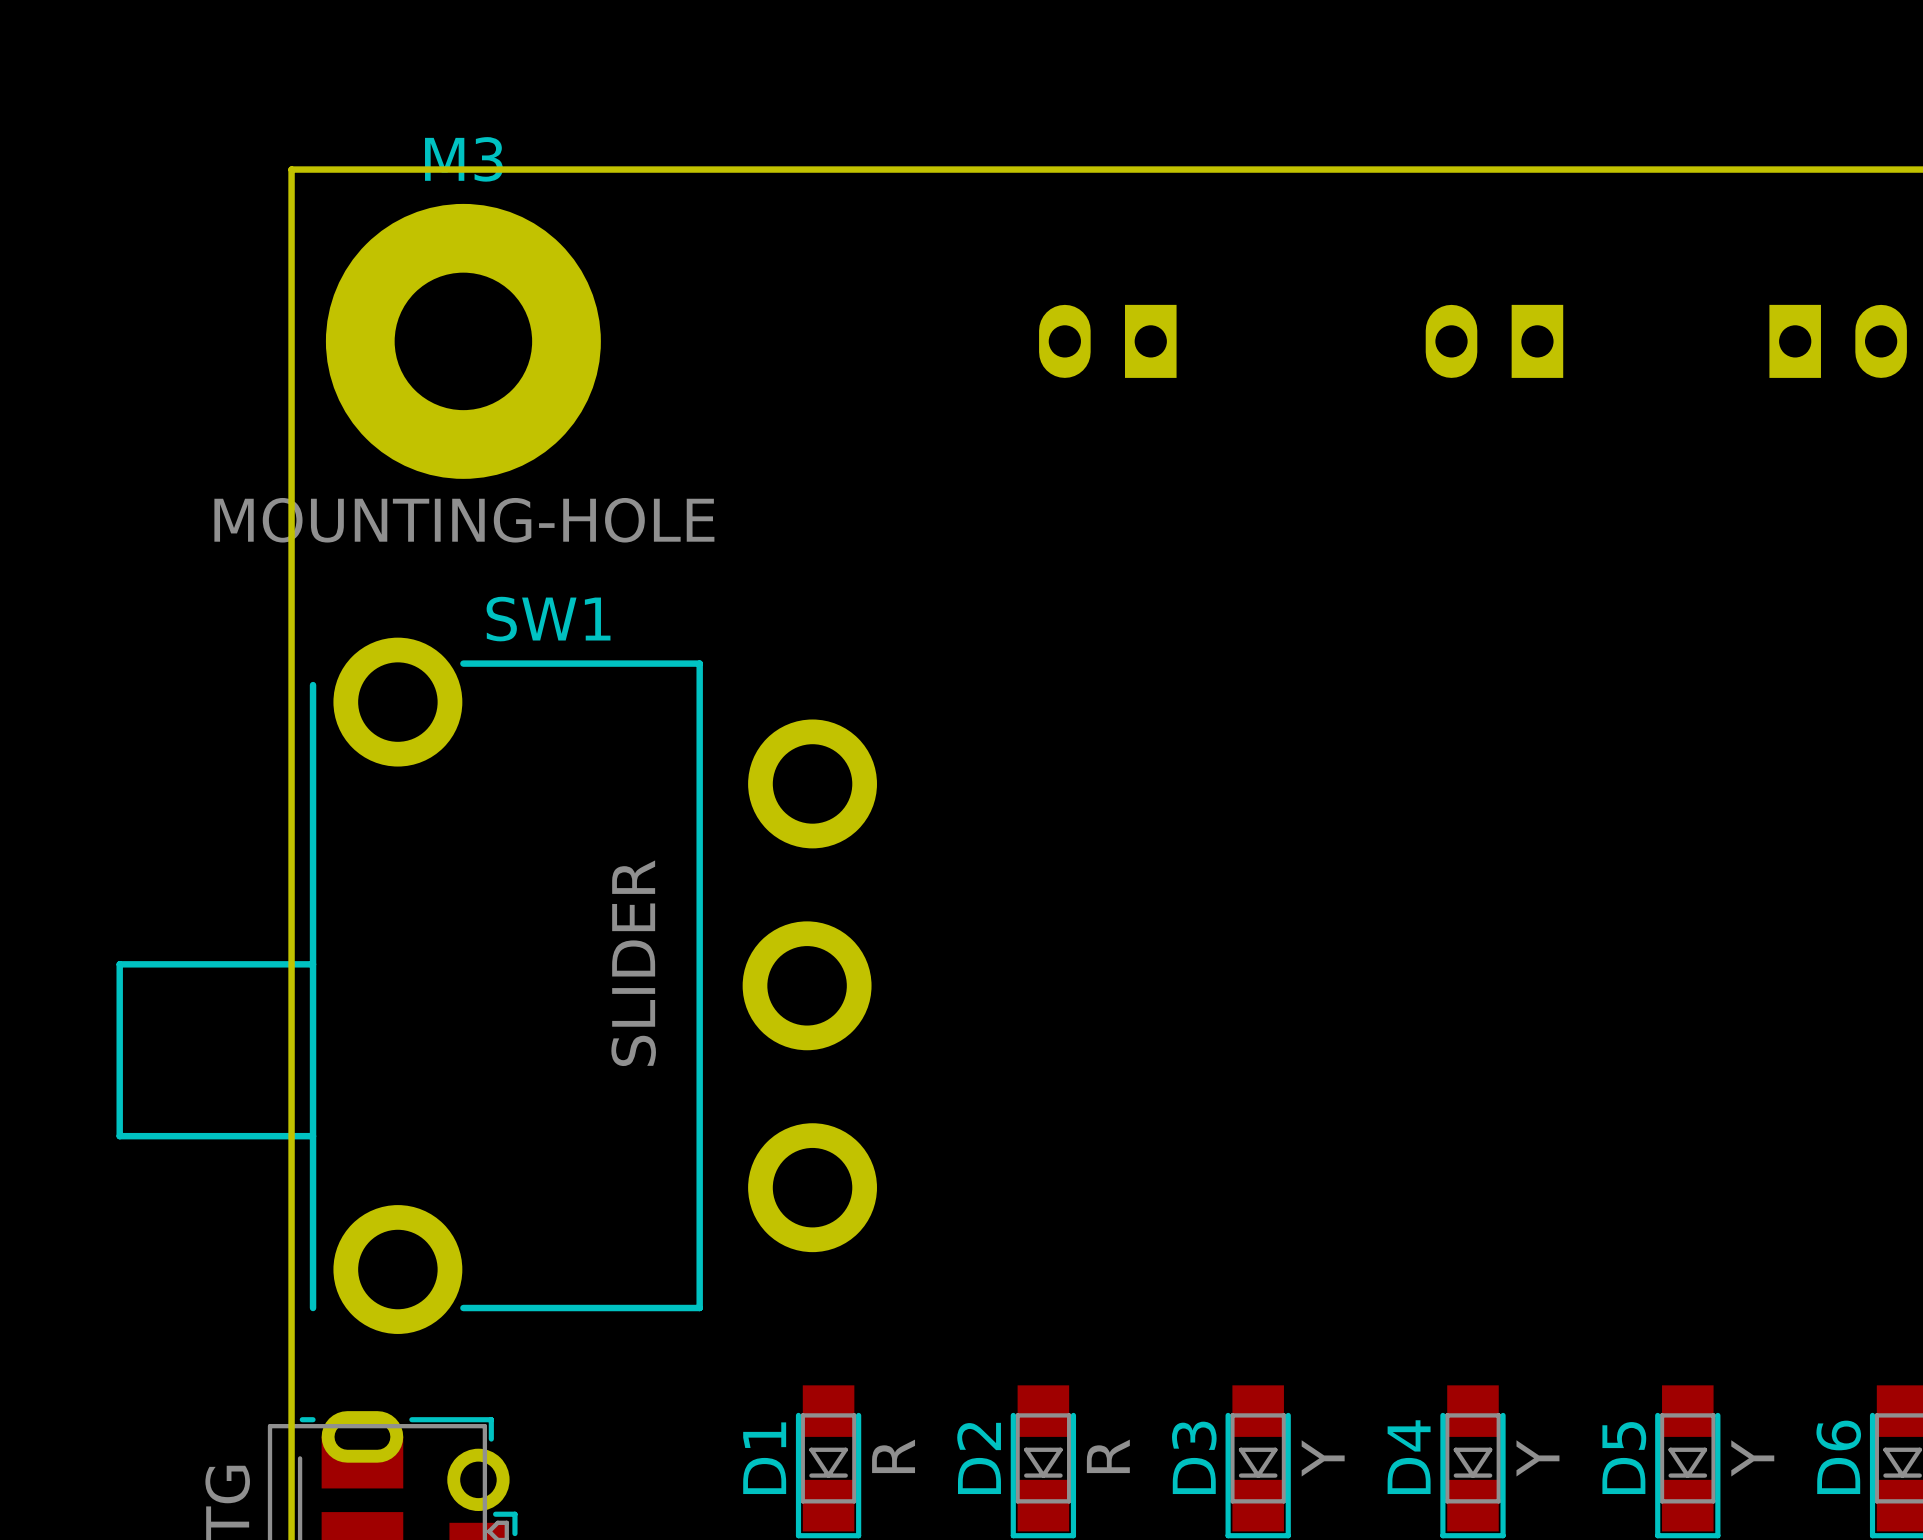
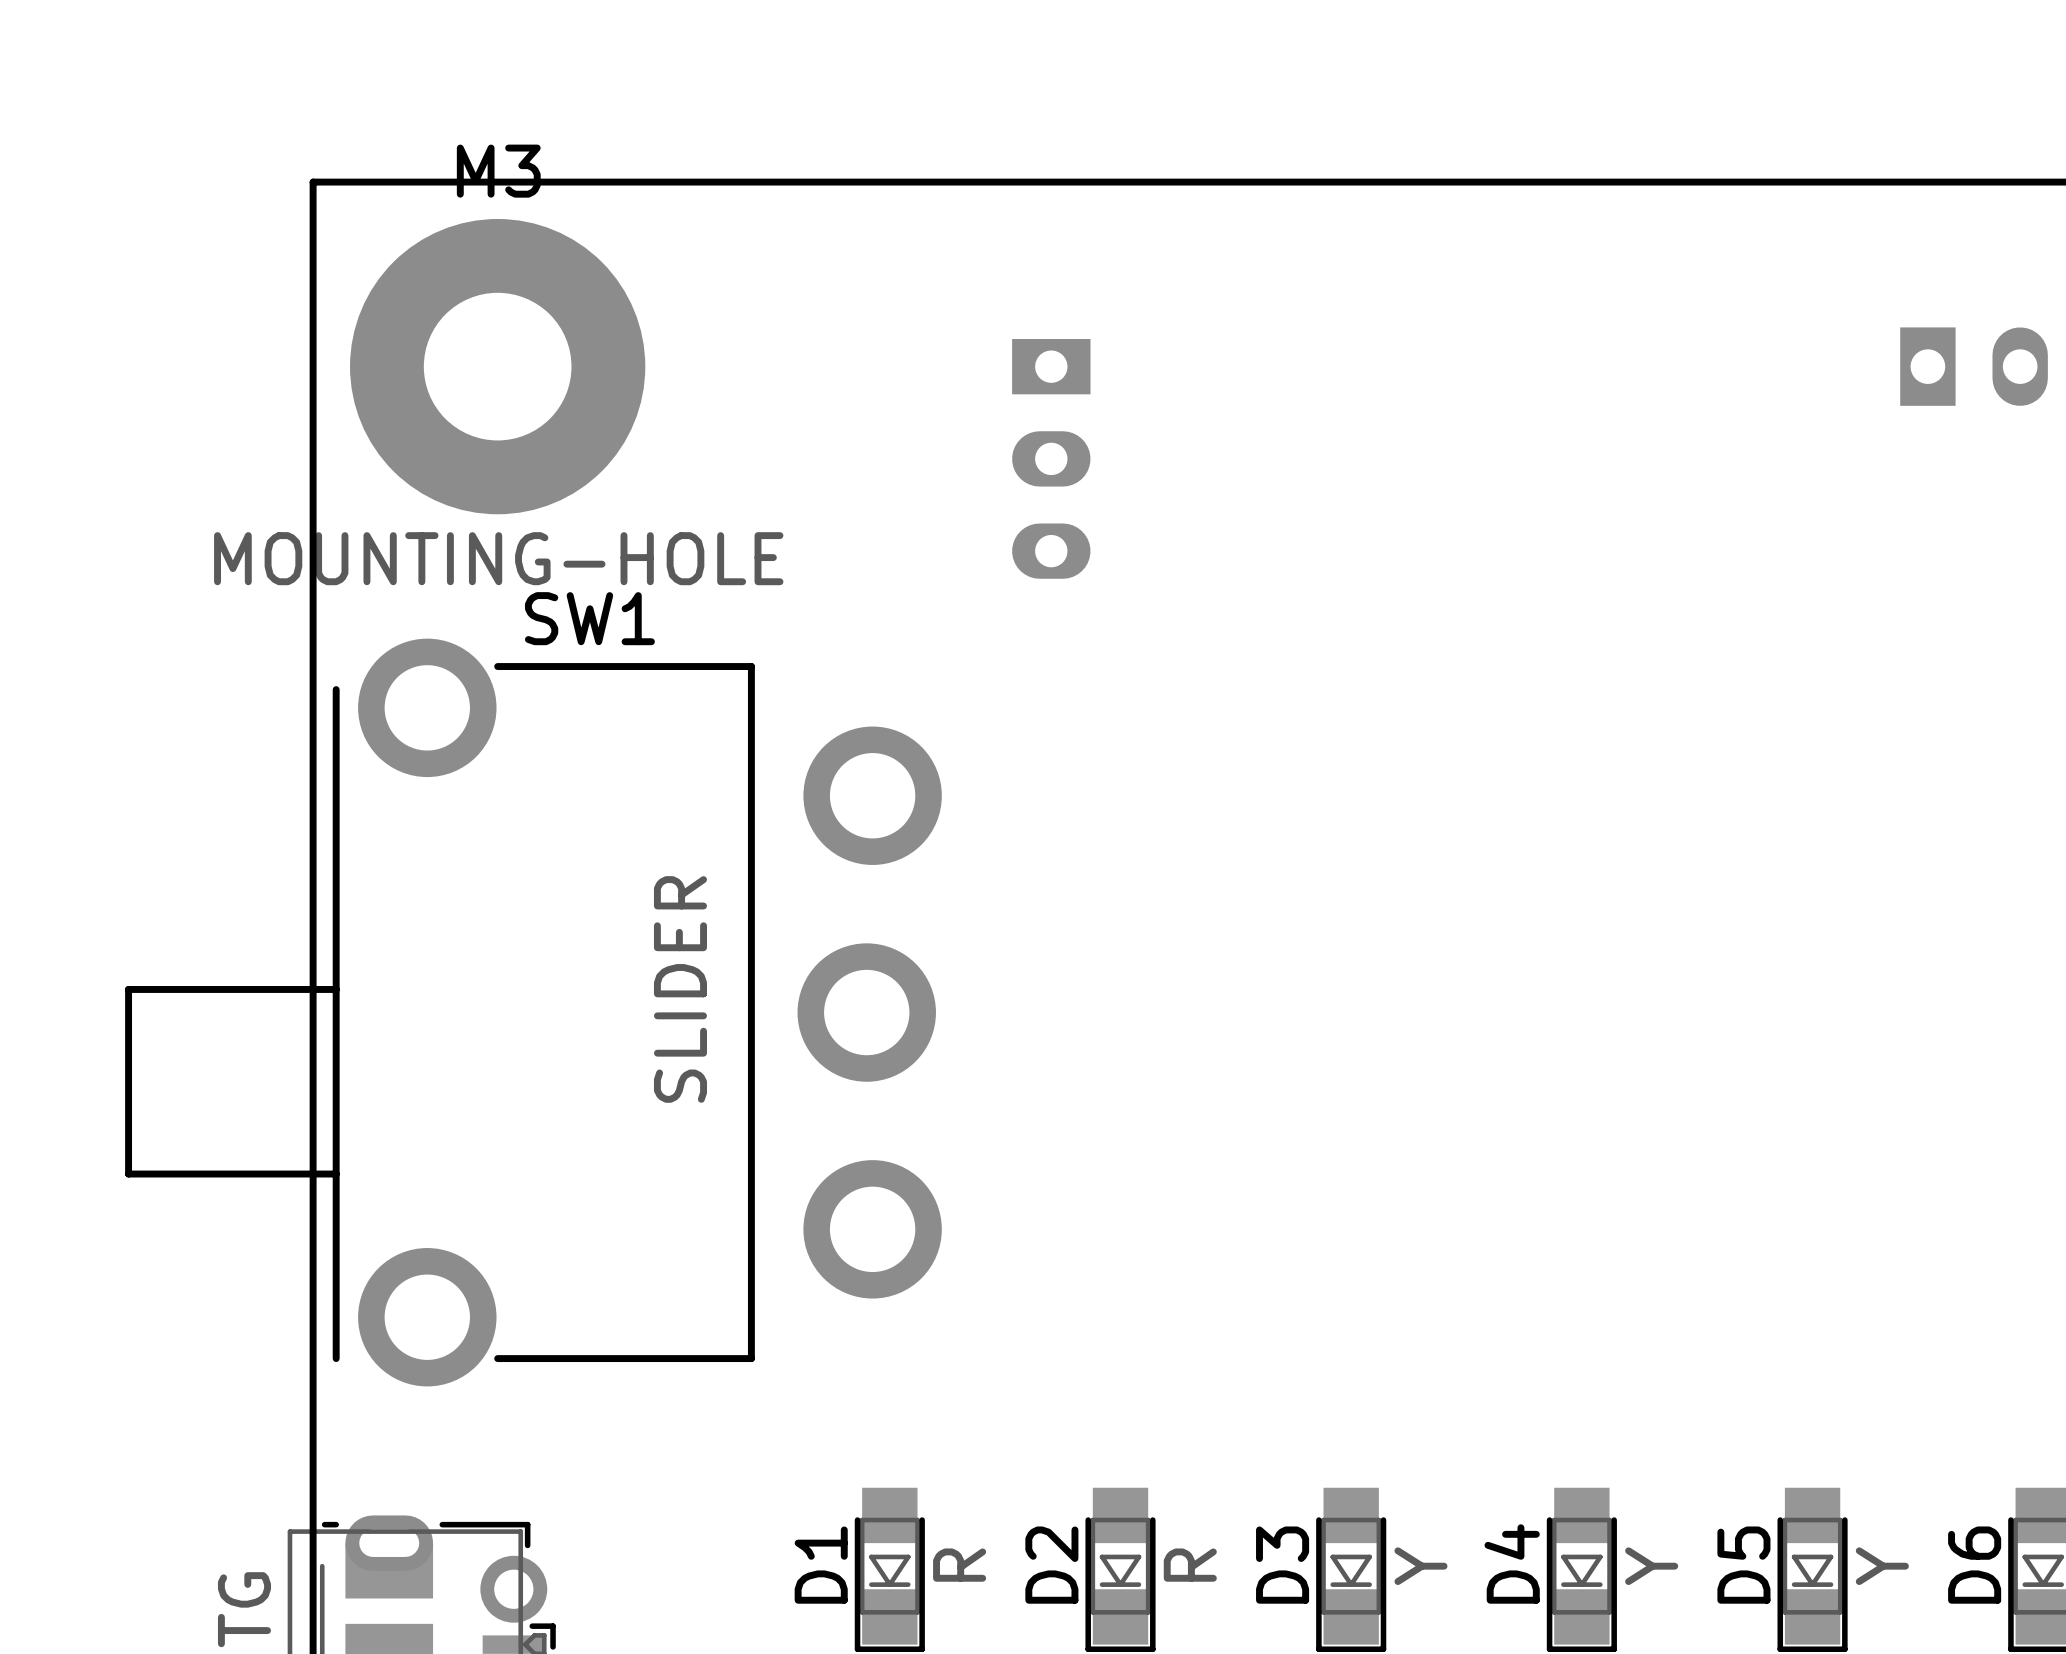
part: (1107, 341) -> none
part: (1494, 341) -> none
part: none -> (1051, 458)
SW1 position: (496, 985) -> (533, 1012)

